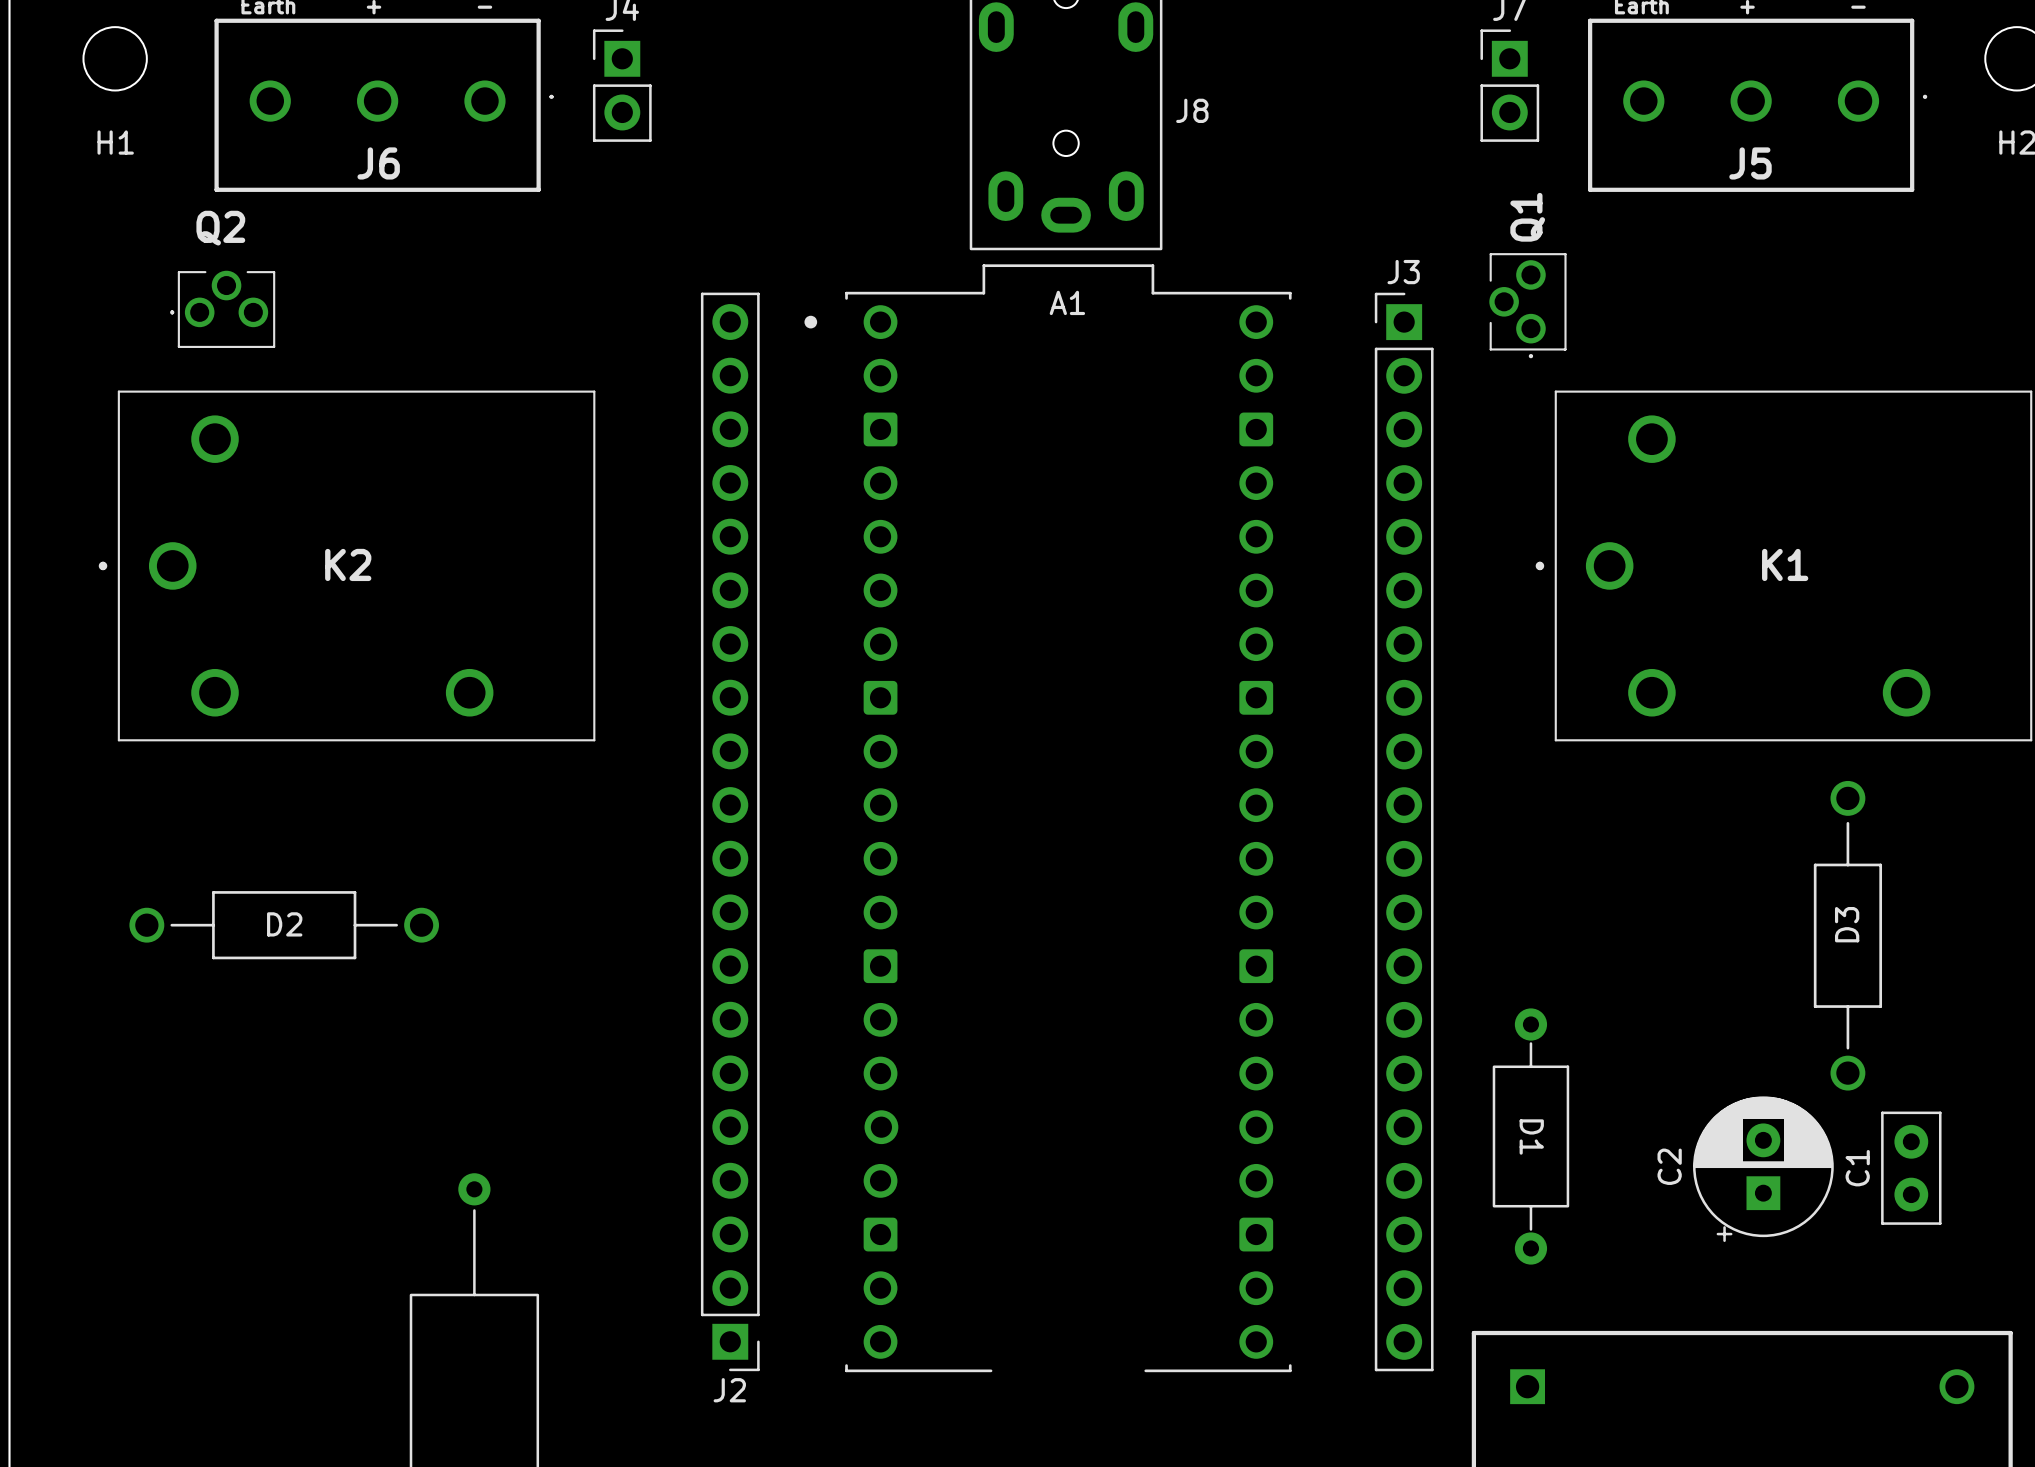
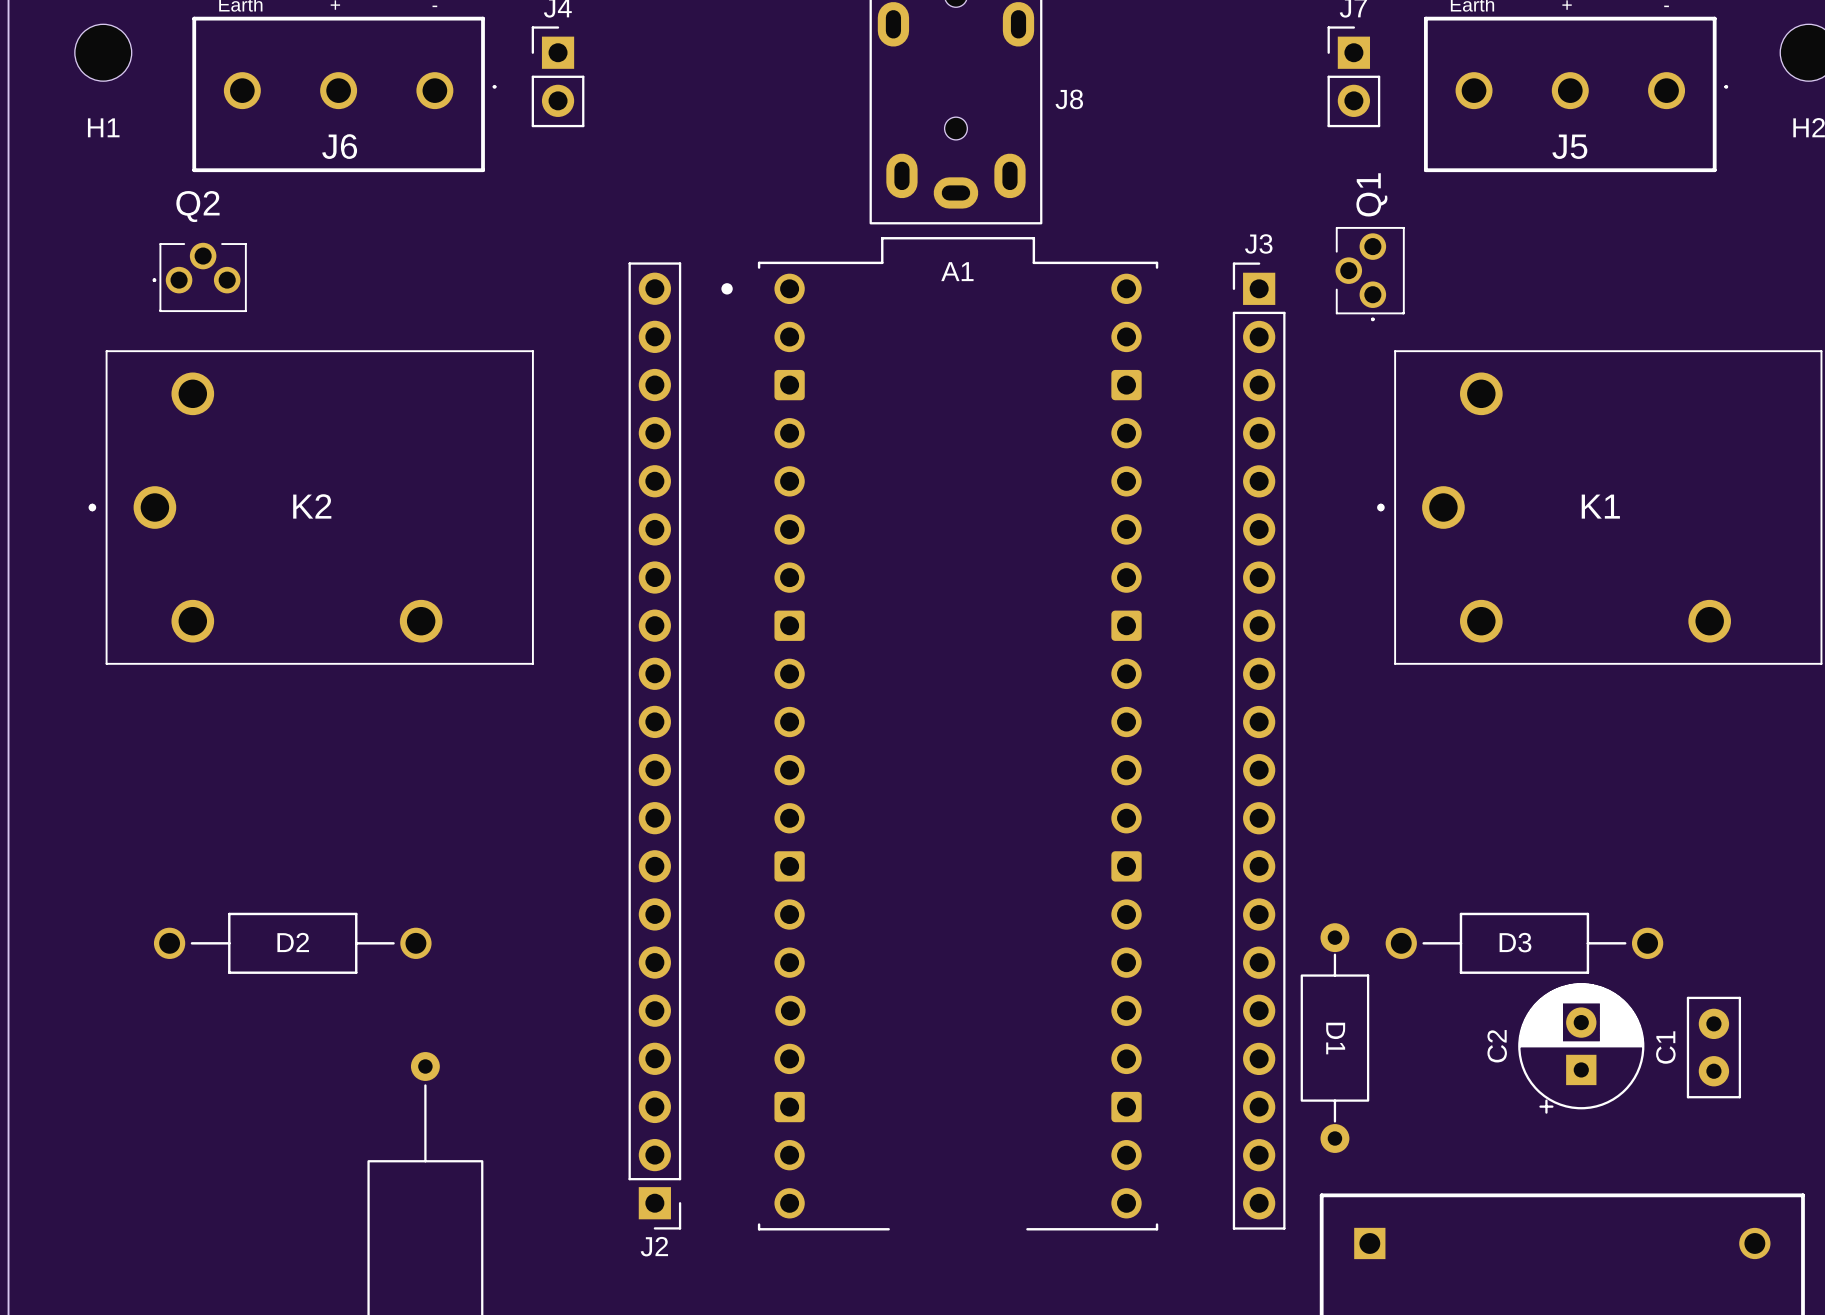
D2 position: (284, 925) -> (292, 943)
D3 rotation: 0° (1847, 935) -> 90° clockwise (1524, 943)
D3 position: (1847, 935) -> (1524, 943)
D1 position: (1530, 1136) -> (1334, 1038)

